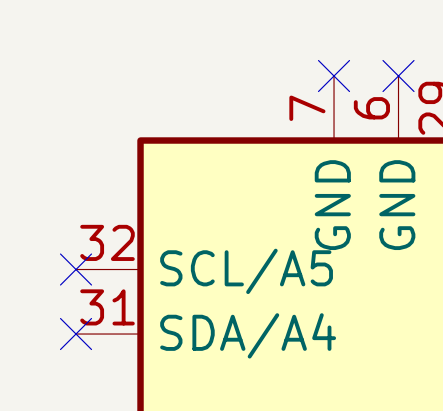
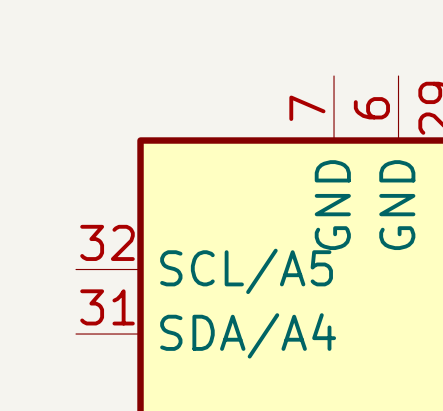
no-connect mark: (334, 76) -> none
no-connect mark: (398, 76) -> none
no-connect mark: (76, 269) -> none
no-connect mark: (76, 334) -> none

